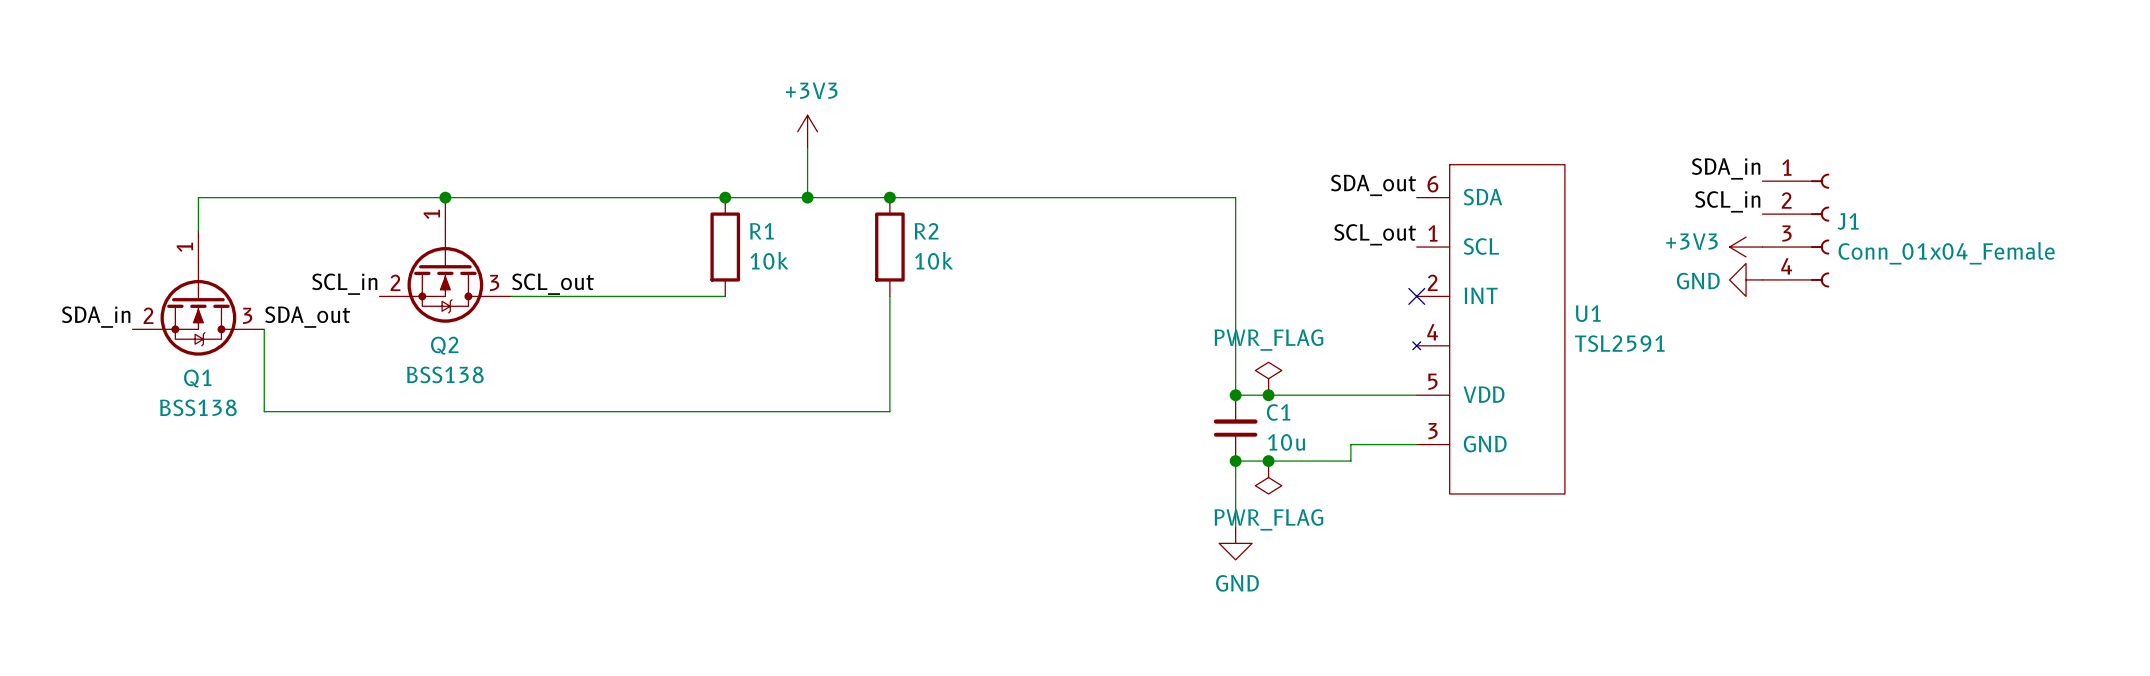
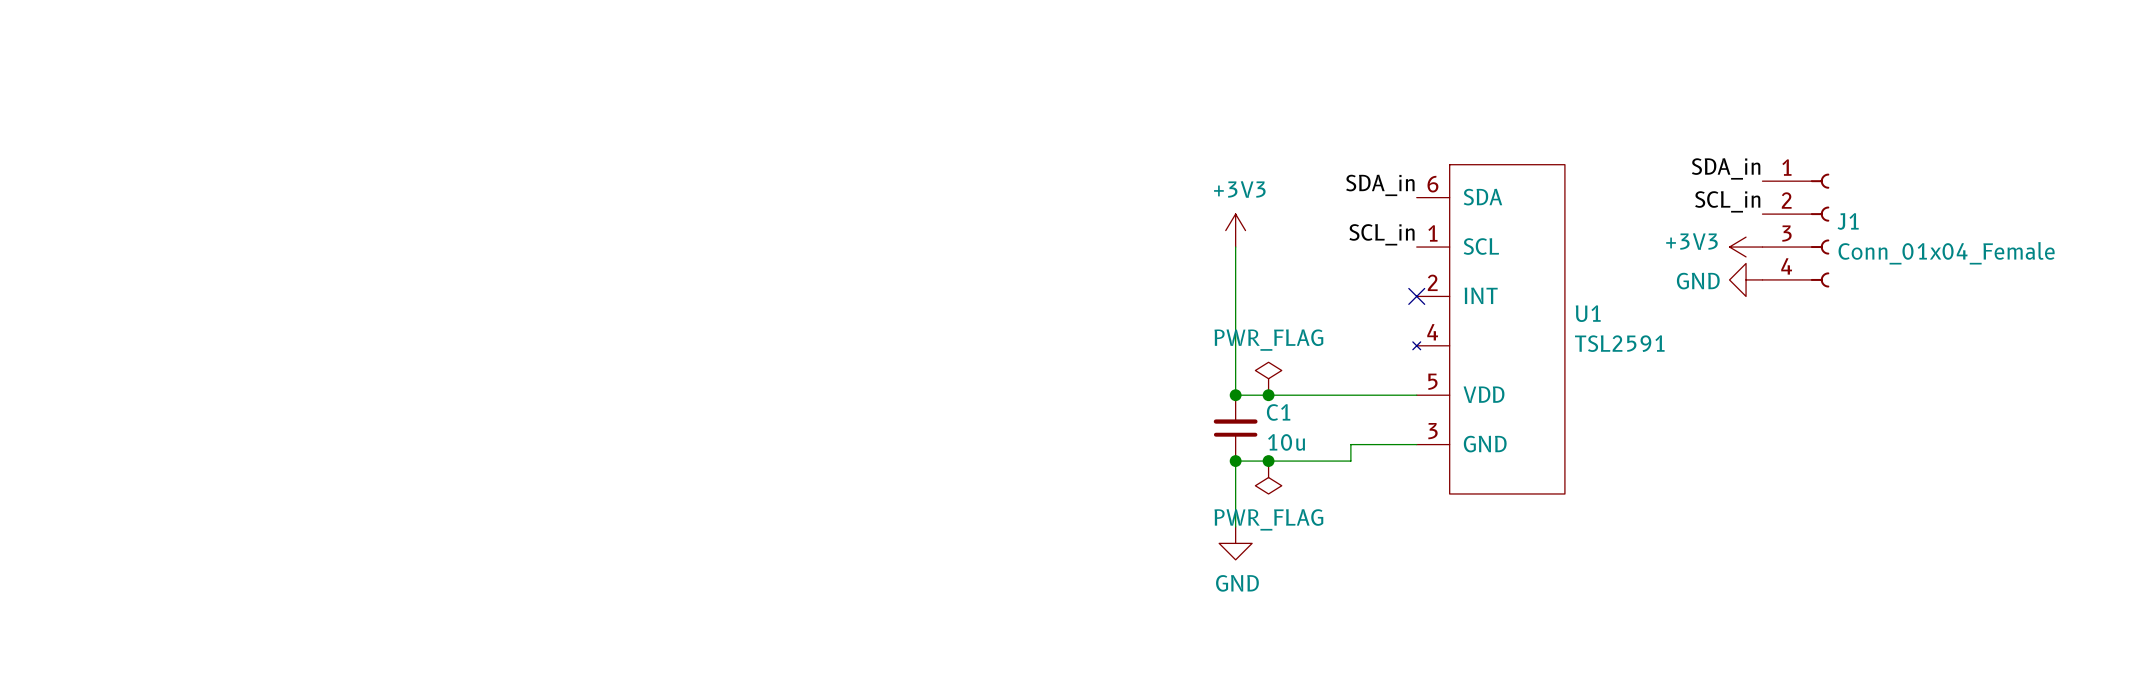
power symbol: +3V3 (807, 131) -> none
wire: (807, 148) (807, 197) -> none
label: SDA_out (1373, 185) -> SDA_in (1380, 185)
junction: (445, 197) -> none
junction: (725, 197) -> none
junction: (807, 197) -> none
junction: (889, 197) -> none
wire: (198, 230) (198, 197) (1235, 197) (1235, 247) -> none
power symbol: none -> +3V3 (1235, 230)
label: SCL_out (1375, 234) -> SCL_in (1381, 234)
R1: 10k (725, 247) -> none
R2: 10k (889, 247) -> none
Q2: BSS138 (445, 260) -> none
label: SCL_in (344, 284) -> none
label: SCL_out (552, 284) -> none
Q1: BSS138 (198, 293) -> none
wire: (511, 296) (725, 296) -> none
wire: (889, 296) (889, 411) (264, 411) (264, 329) -> none
label: SDA_in (96, 317) -> none
label: SDA_out (307, 317) -> none

